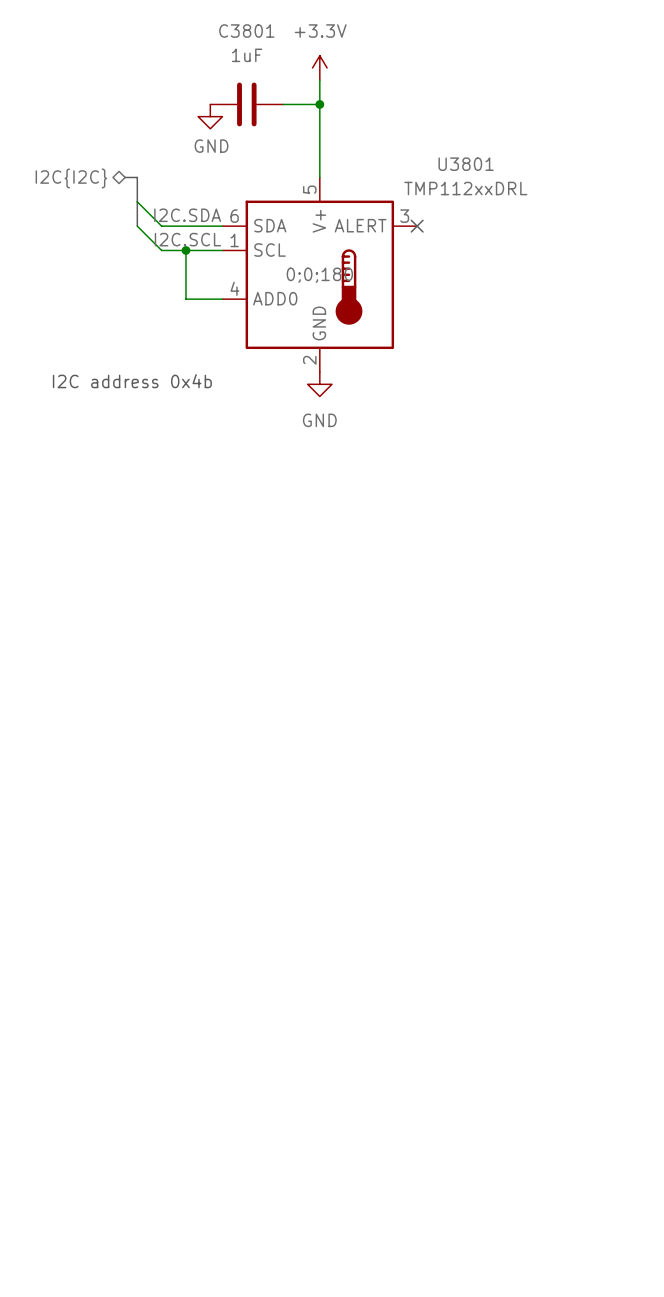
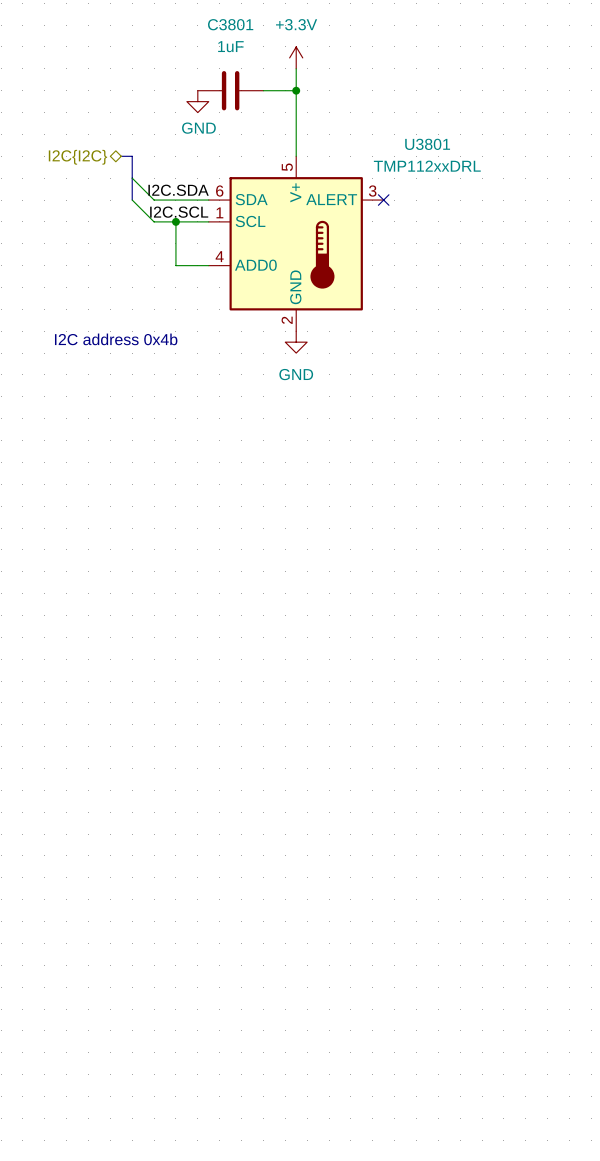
U3801 text: 0;0;180 (319, 275) -> none

